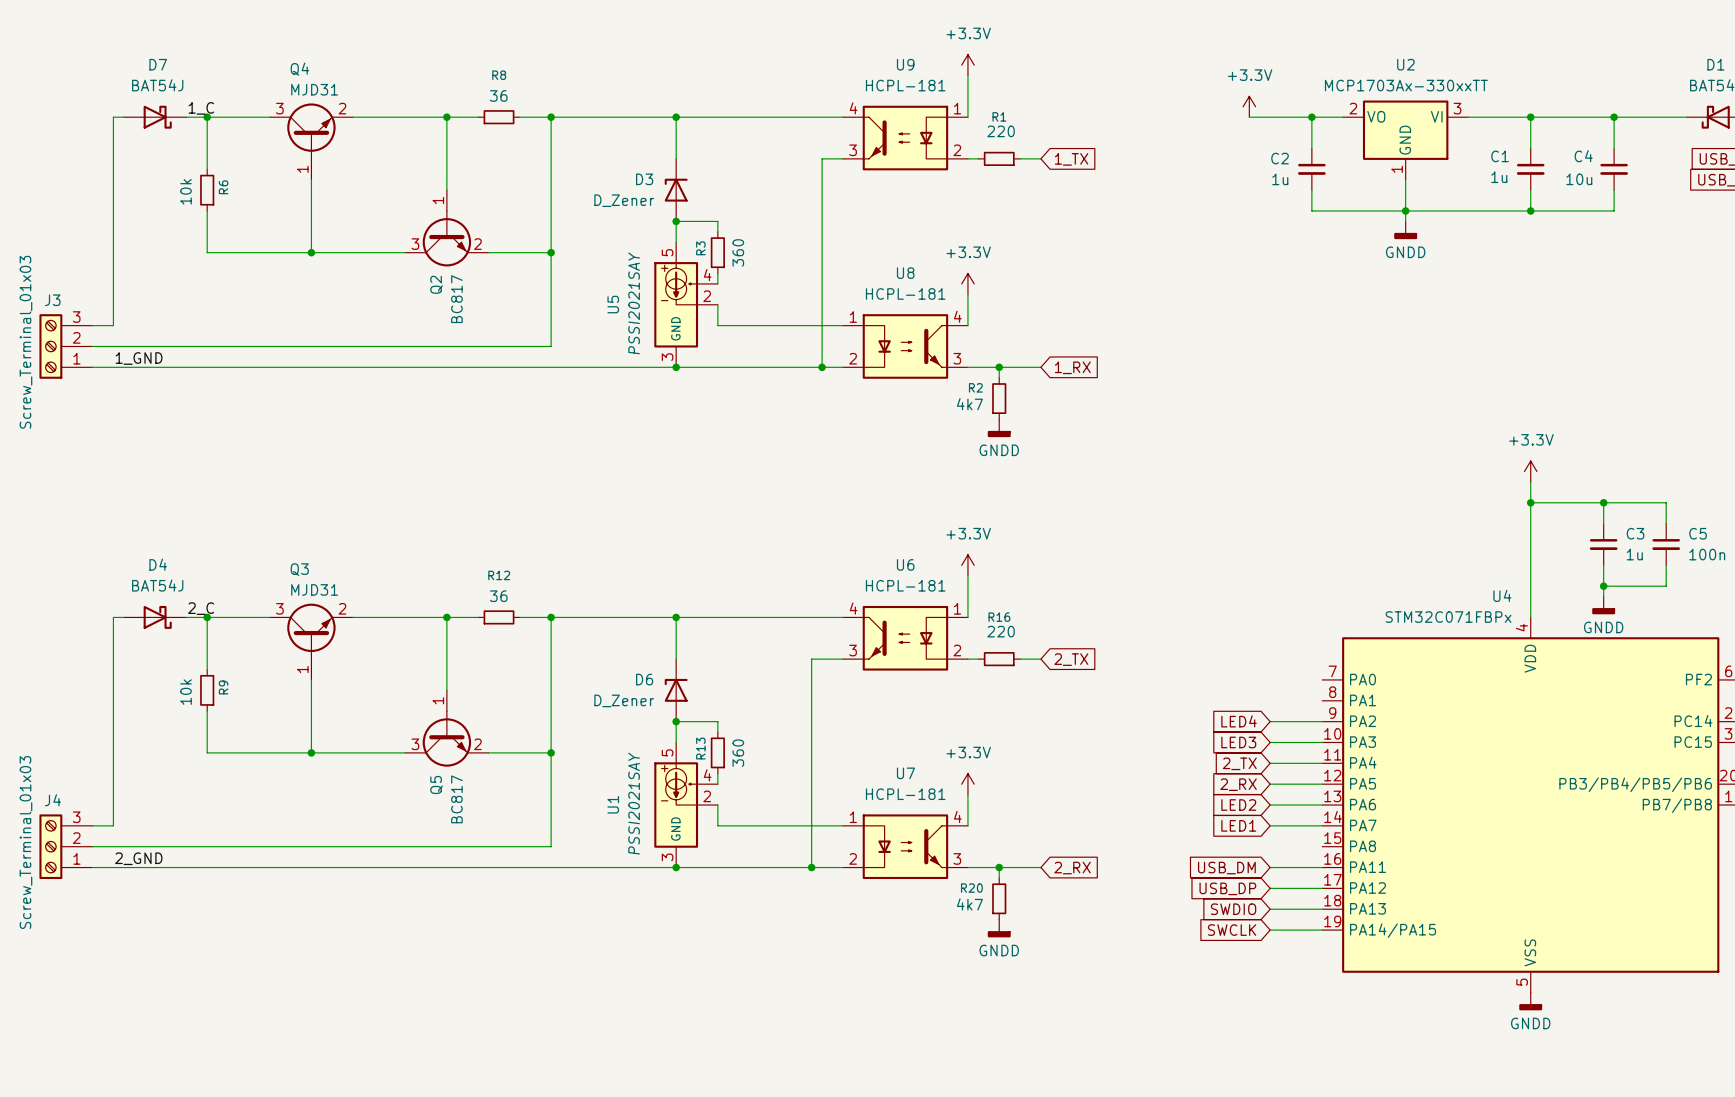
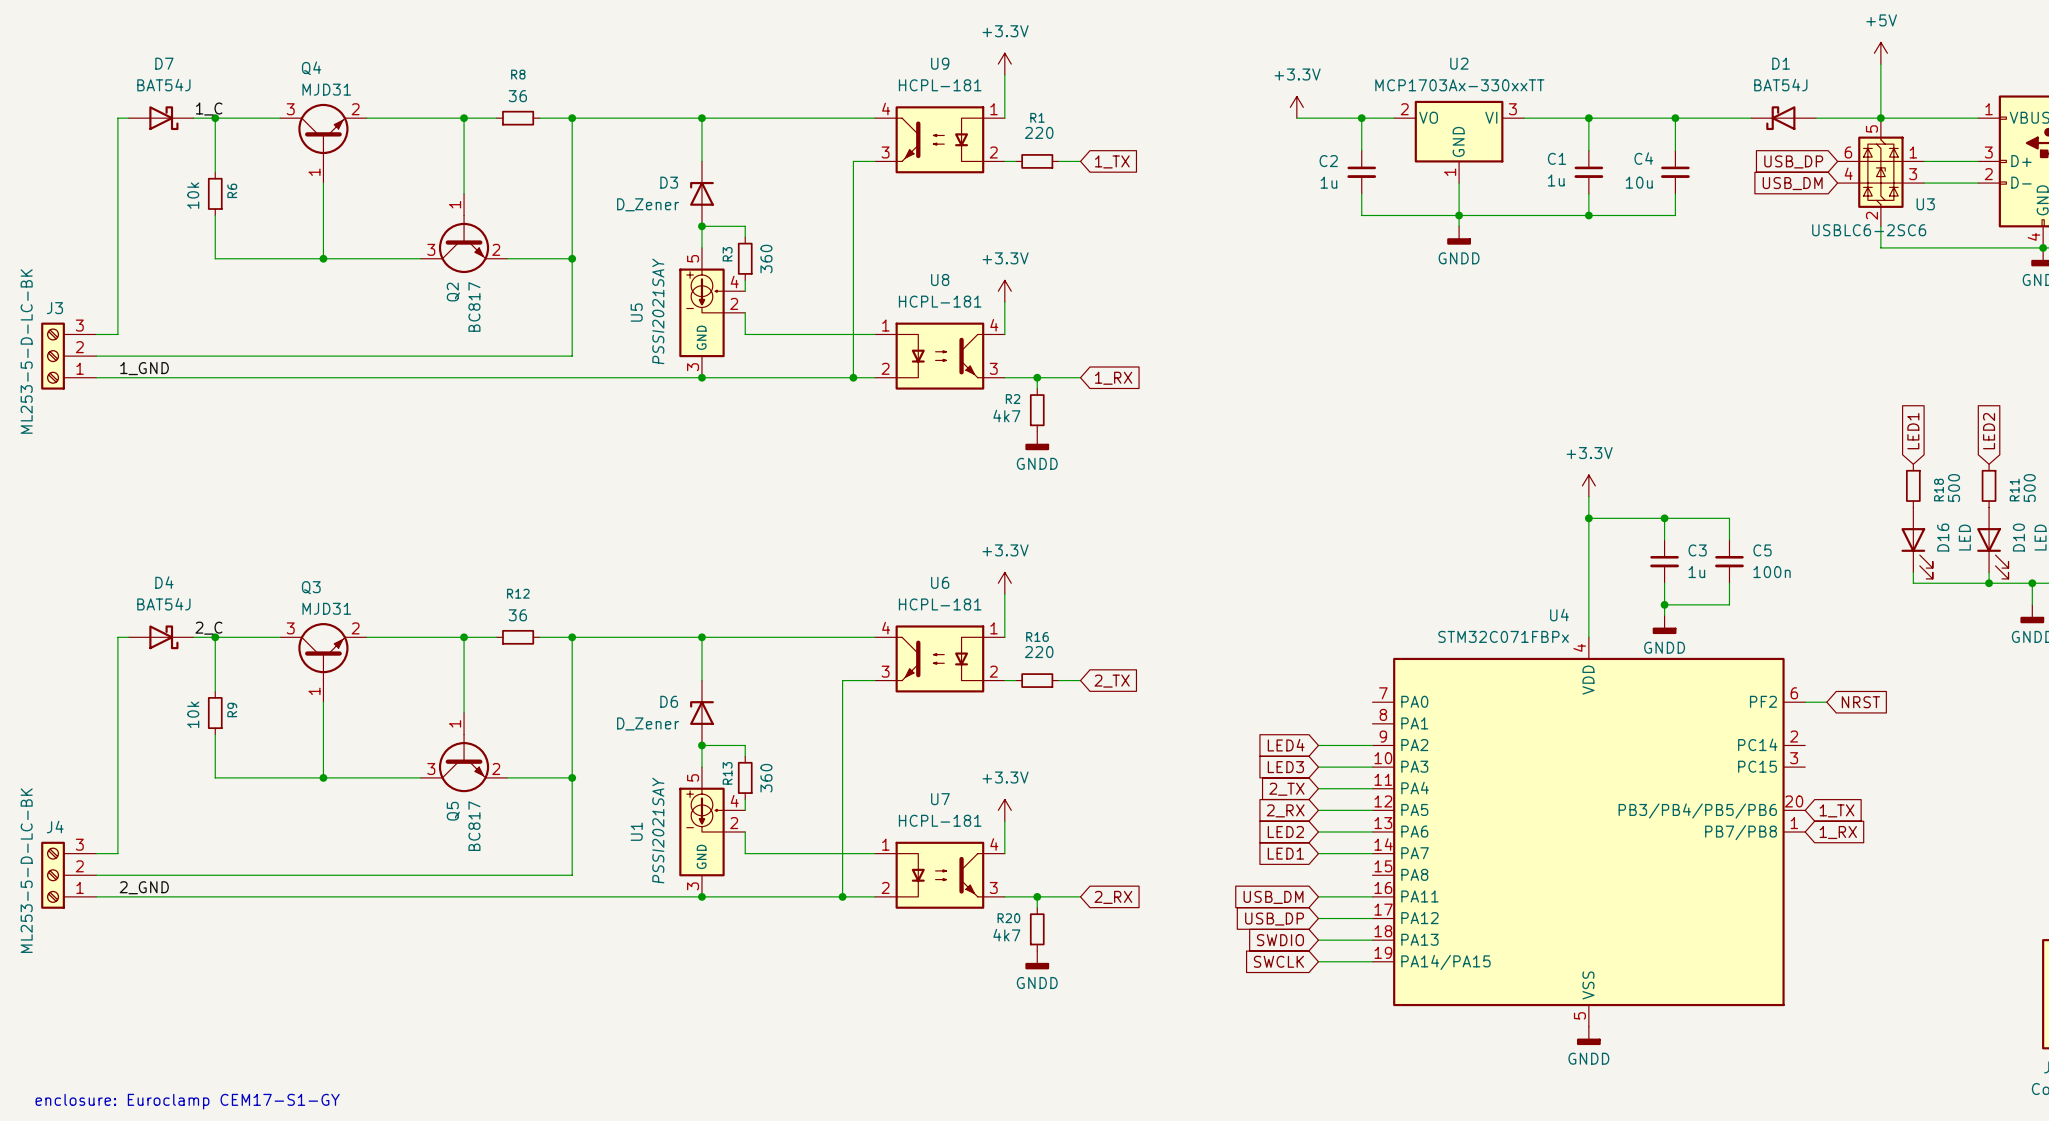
J3 value: Screw_Terminal_01x03 (25, 342) -> ML253-5-D-LC-BK (26, 351)
J4 value: Screw_Terminal_01x03 (25, 842) -> ML253-5-D-LC-BK (26, 870)
text: none -> enclosure: Euroclamp CEM17-S1-GY (187, 1101)

